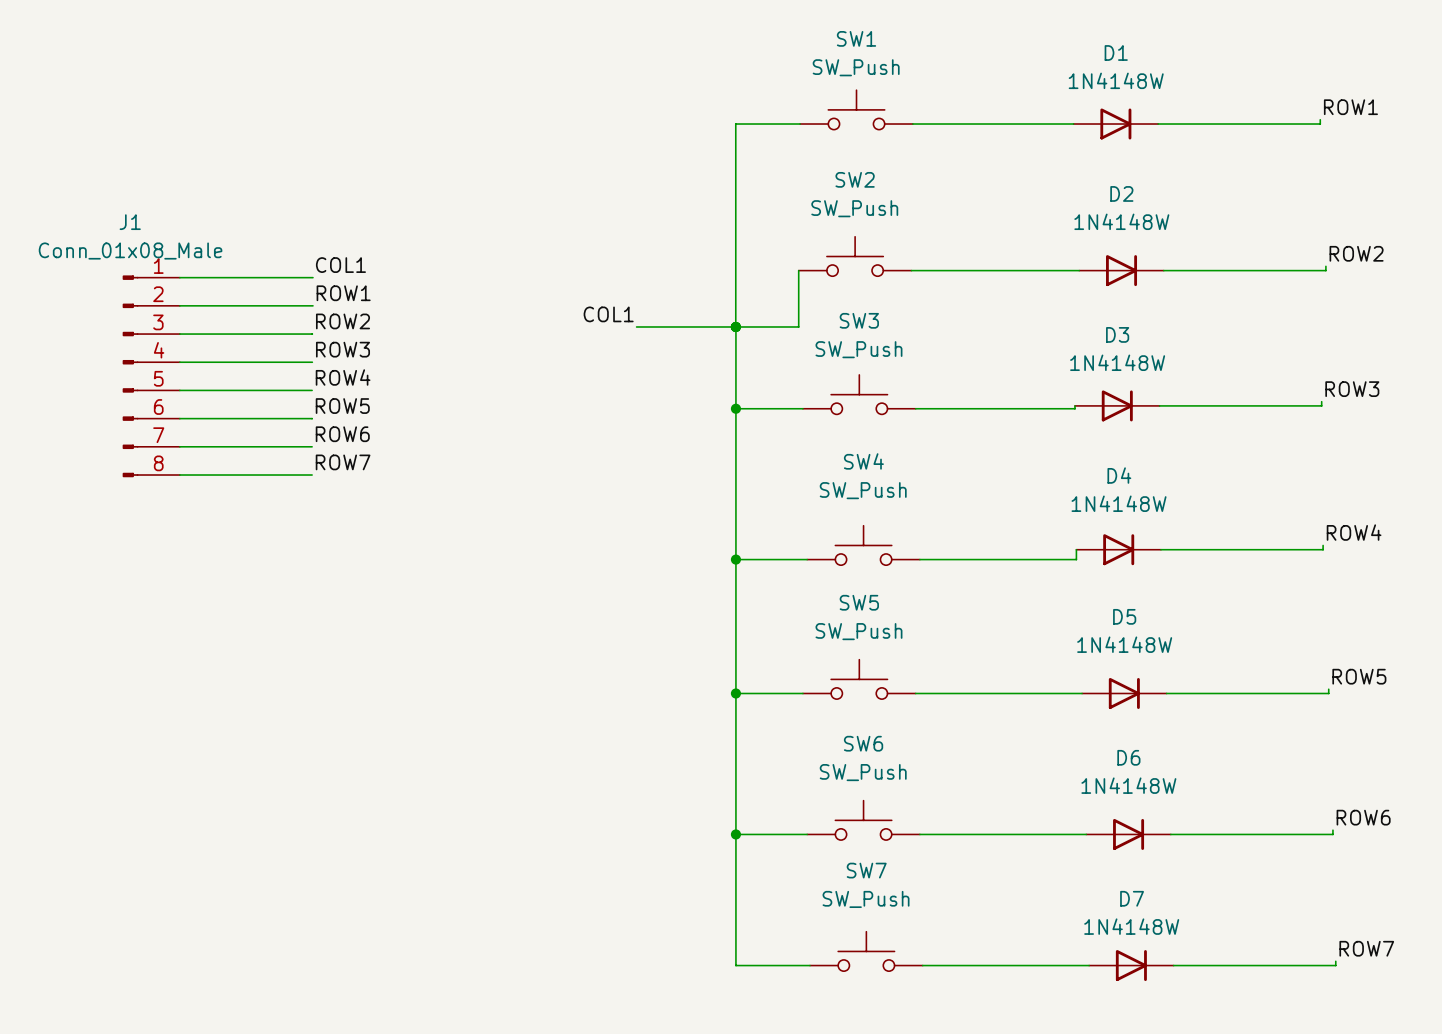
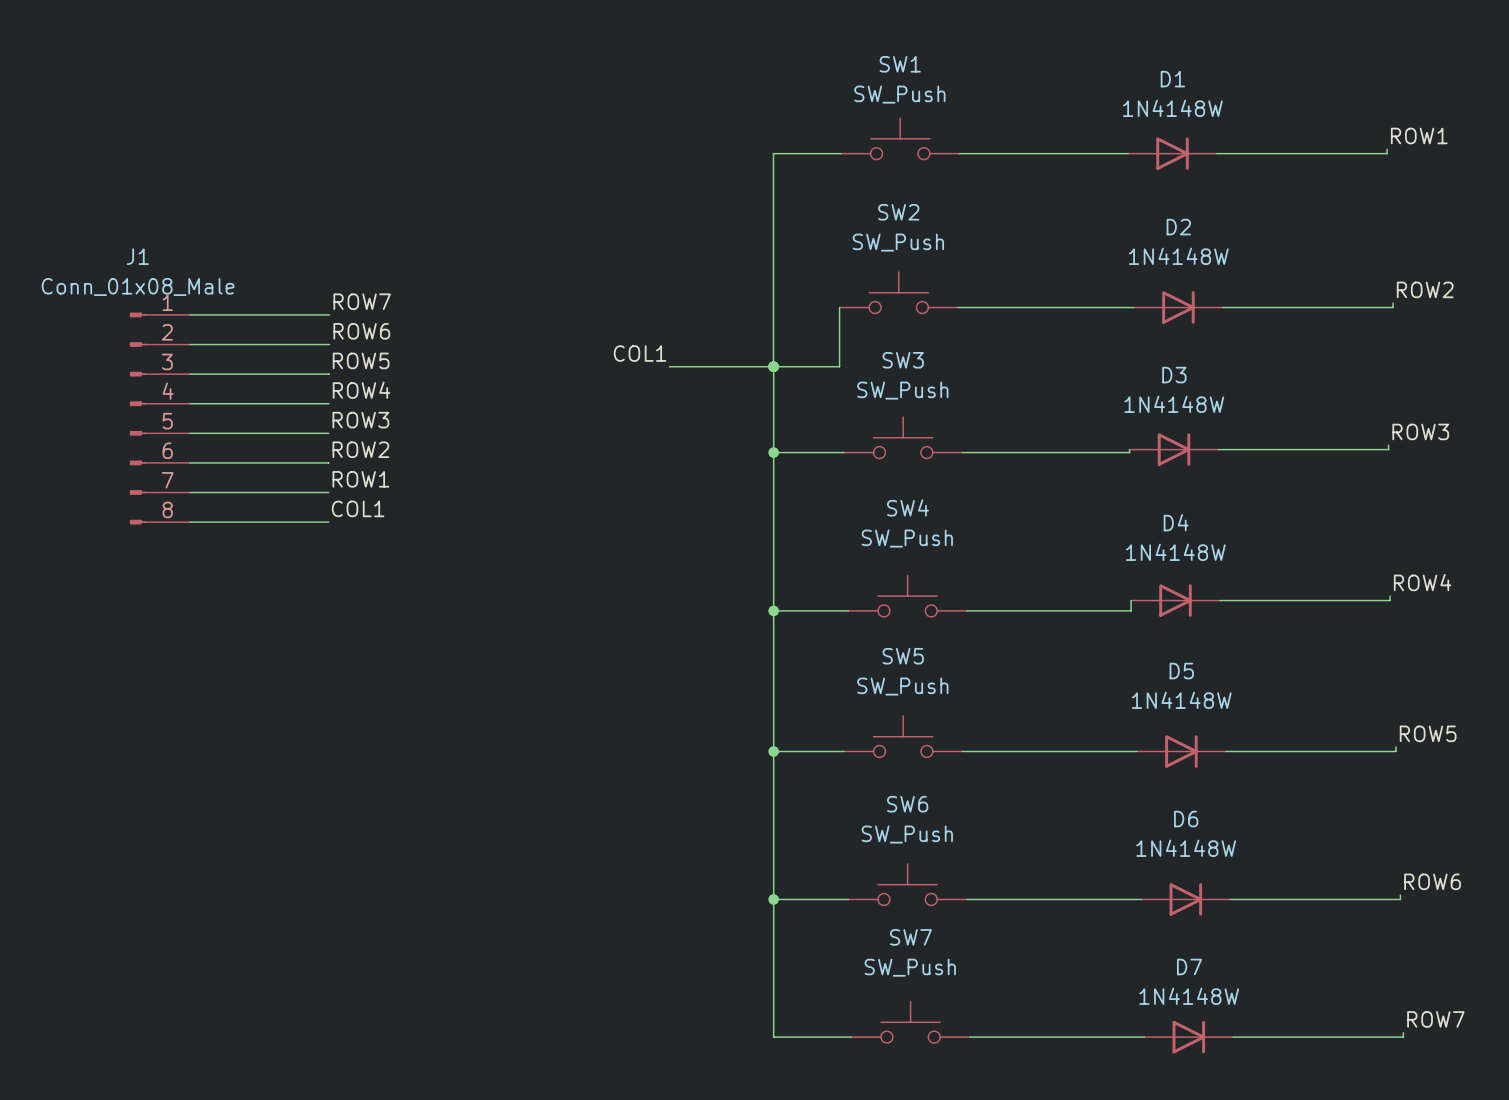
label: COL1 (340, 265) -> ROW7 (362, 301)
label: ROW1 (343, 293) -> ROW6 (361, 331)
label: ROW2 (342, 321) -> ROW5 (361, 360)
label: ROW3 (342, 349) -> ROW4 (361, 390)
label: ROW4 (343, 377) -> ROW3 (360, 420)
label: ROW5 (342, 406) -> ROW2 (360, 449)
label: ROW6 (342, 434) -> ROW1 (360, 479)
label: ROW7 (343, 462) -> COL1 (358, 508)

